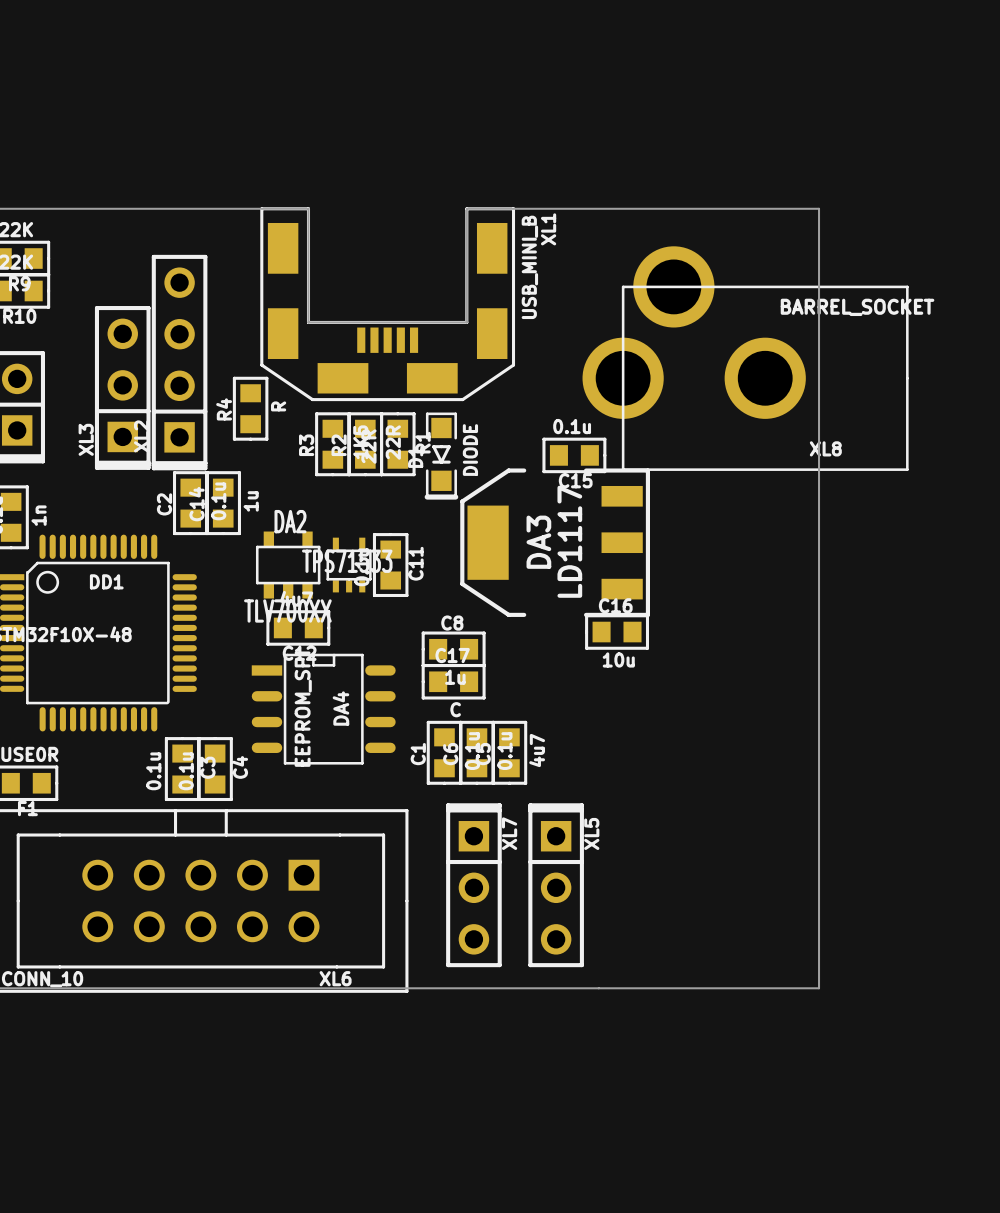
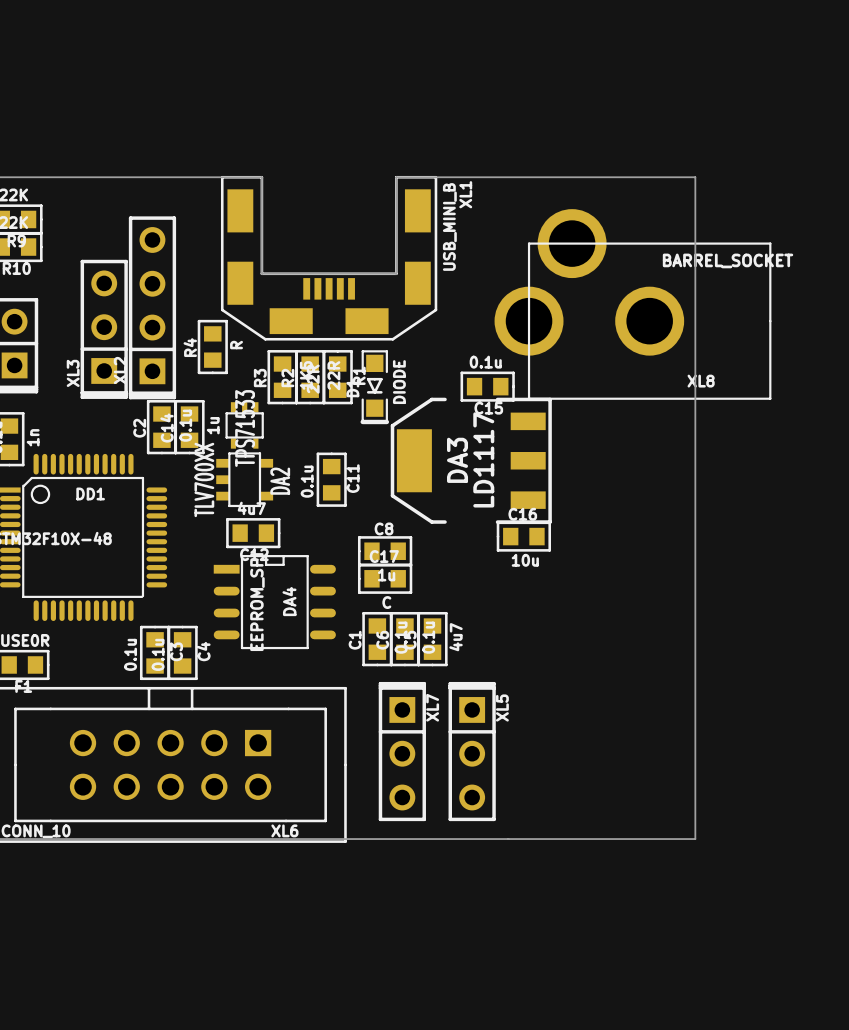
DA2 rotation: 0° (288, 565) -> 90° clockwise (244, 479)
part rotation: 0° (349, 565) -> 180° (244, 425)
part position: (349, 565) -> (244, 425)

